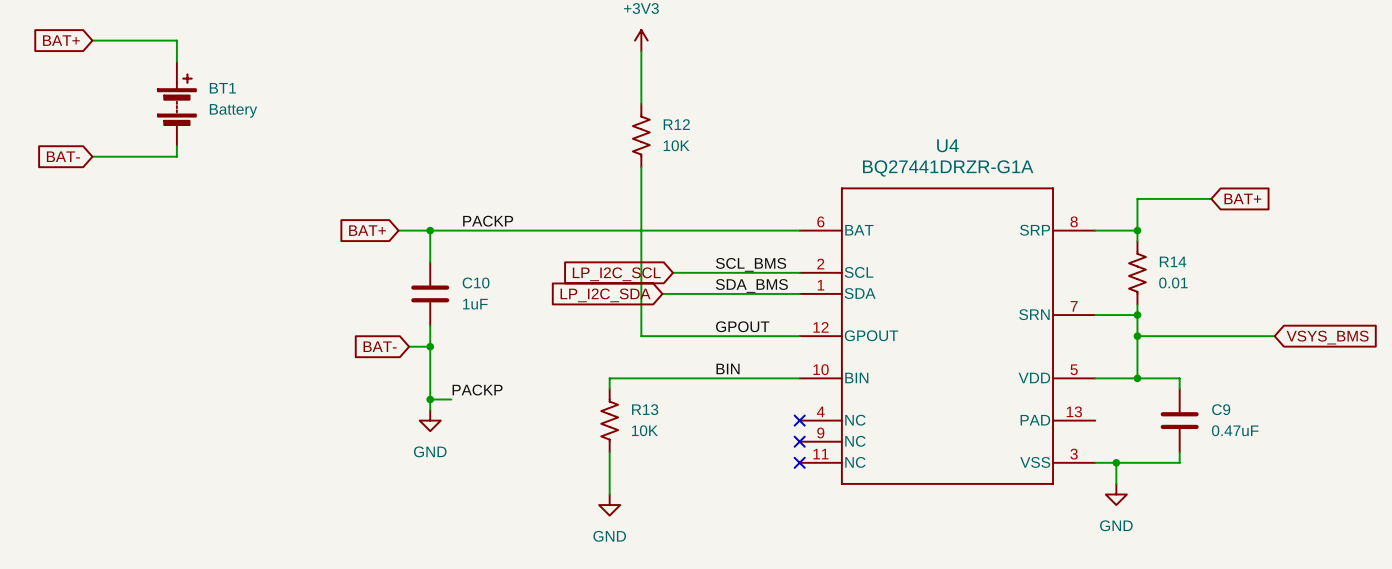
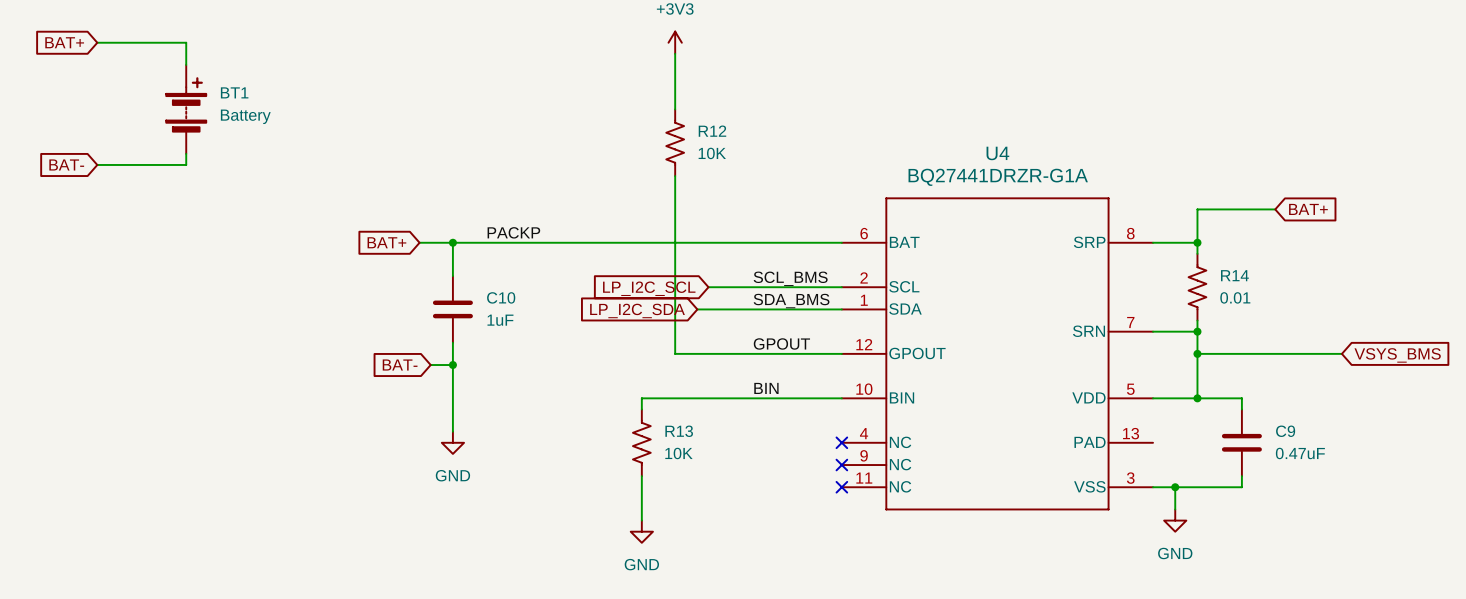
label: PACKP (477, 390) -> none
wire: (430, 399) (451, 399) -> none
junction: (430, 399) -> none

